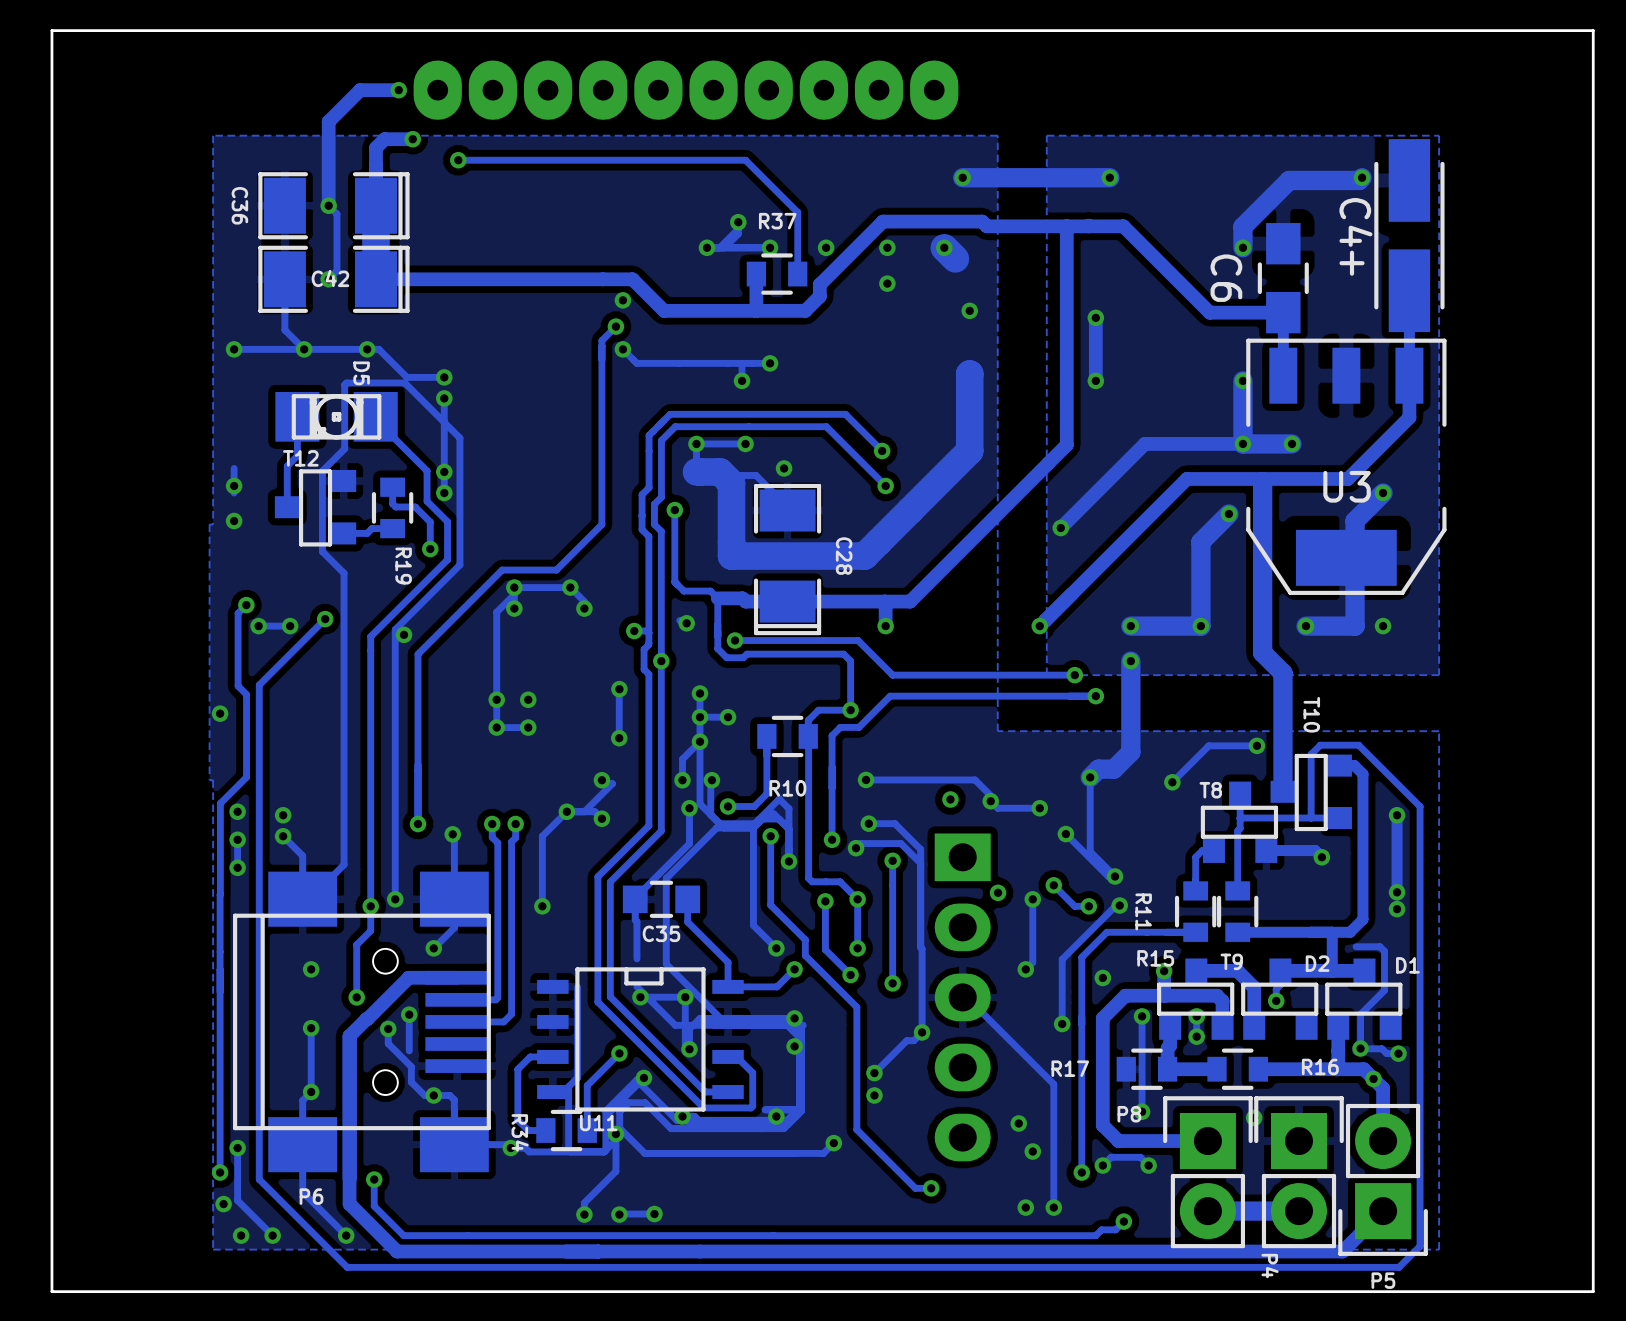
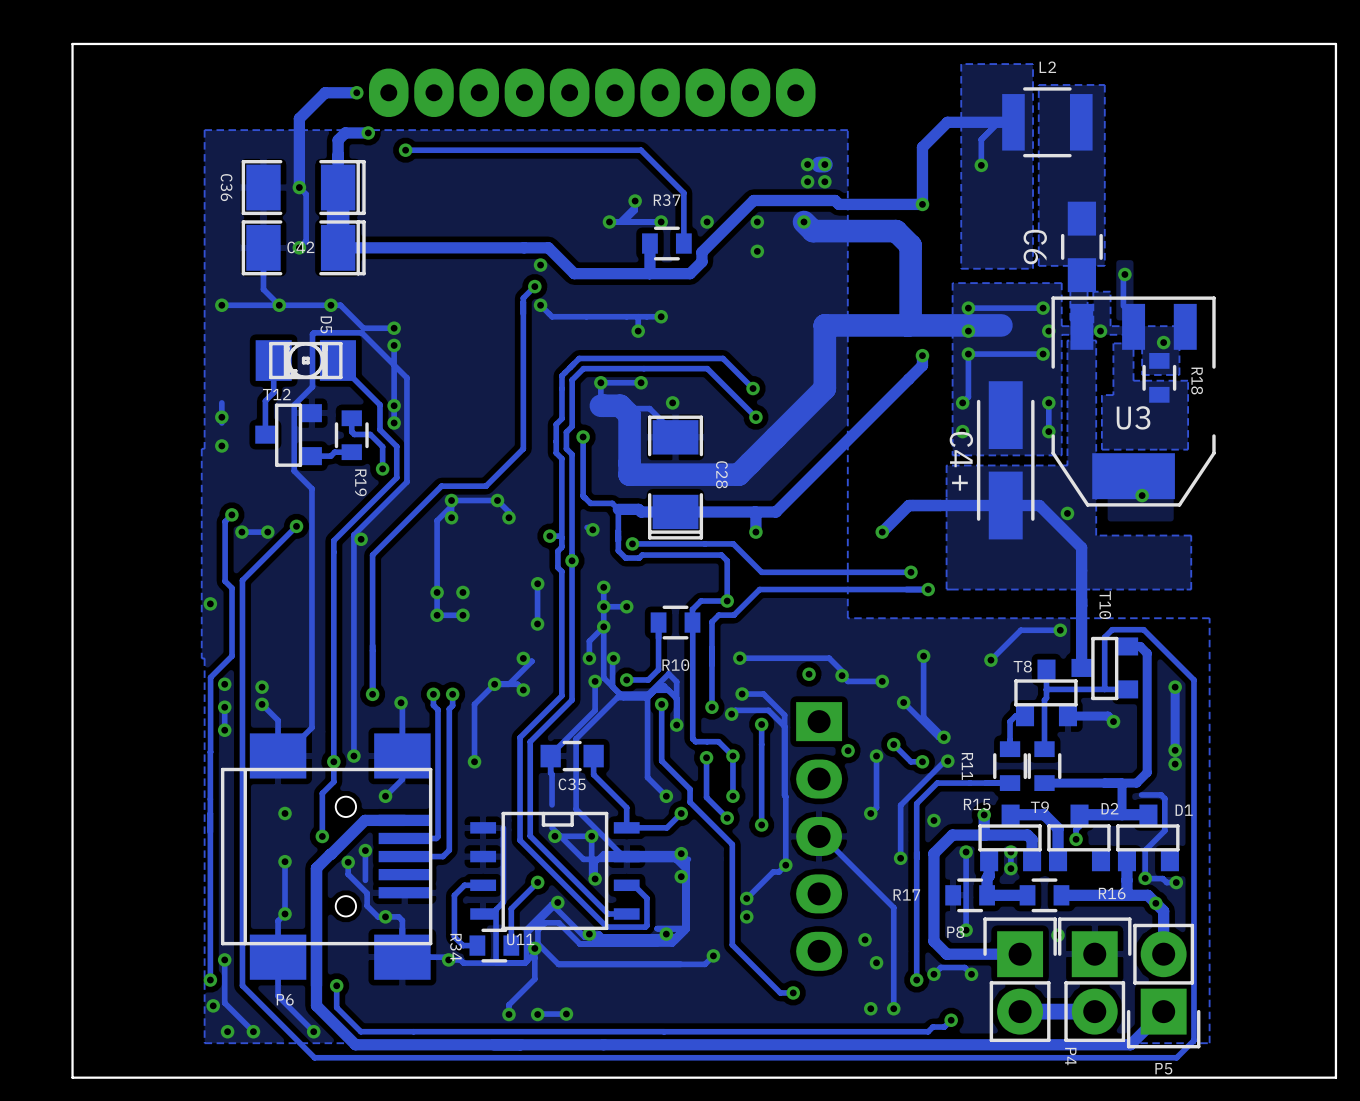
zone outline: none -> (1033, 64) (1033, 268) (961, 268) (961, 64) (1033, 64)
zone outline: none -> (1104, 84) (1038, 84) (1038, 265) (1070, 265) (1070, 320) (1087, 320) (1087, 265) (1104, 265) (1104, 84)
L2: none -> (1047, 122)
zone outline: (1439, 135) (1046, 135) (1046, 675) (1439, 675) (1439, 135) -> none
via: none -> (807, 164)
via: (962, 177) -> none
via: none -> (824, 164)
track: (1109, 177) (969, 177) -> none
via: (1109, 177) -> none
track: (1362, 177) (1359, 180) (1289, 180) (1242, 226) (1242, 247) -> none
via: (1362, 177) -> none
via: none -> (981, 165)
via: none -> (807, 181)
via: none -> (824, 181)
track: (1066, 226) (1066, 444) -> (922, 355) (922, 365) (904, 383)
track: (1088, 226) (1123, 226) (1209, 312) (1283, 312) (1283, 375) -> (922, 203) (922, 147) (947, 122) (1013, 122) (998, 122) (981, 139) (981, 165)
via: none -> (922, 204)
C4 position: (1409, 235) -> (1005, 460)
via: (1242, 247) -> none
track: none -> (813, 231) (896, 231) (910, 245) (910, 322) (907, 325)
track: (1409, 290) (1409, 417) (1347, 478) (1186, 478) (1072, 593) -> (1081, 570) (1081, 547) (1039, 505) (908, 505)
via: (969, 310) -> none
track: none -> (1124, 274) (1123, 306)
via: none -> (1124, 274)
track: (1095, 317) (1095, 380) -> none
via: (1095, 317) -> none
zone outline: none -> (1061, 283) (1061, 326) (1093, 326) (1093, 291) (1110, 291) (1110, 326) (1179, 326) (1179, 374) (1142, 374) (1142, 334) (1061, 334) (1061, 455) (952, 455) (952, 283) (1061, 283)
via: none -> (968, 308)
track: none -> (1043, 308) (968, 308) (968, 331)
via: none -> (1043, 308)
track: none -> (1001, 325) (824, 325)
via: (1095, 380) -> none
via: none -> (968, 331)
track: (1242, 380) (1242, 443) -> none
via: none -> (1100, 331)
zone outline: none -> (1096, 340) (1096, 535) (1191, 535) (1191, 589) (946, 589) (946, 465) (1067, 465) (1067, 340) (1096, 340)
via: none -> (1163, 342)
zone outline: none -> (1133, 343) (1113, 343) (1113, 395) (1101, 395) (1101, 449) (1188, 449) (1188, 380) (1133, 380) (1133, 343)
via: none -> (968, 354)
track: none -> (1043, 354) (968, 354) (968, 397) (962, 402)
via: none -> (1043, 354)
via: none -> (922, 355)
R18: none -> (1159, 377)
track: (1242, 443) (1144, 443) (1060, 528) -> none
via: (1242, 443) -> none
track: (1291, 443) (1242, 443) -> none
via: (1291, 443) -> none
via: none -> (962, 402)
track: none -> (1048, 402) (1048, 431)
via: none -> (1048, 402)
track: (1262, 478) (1262, 652) (1282, 673) (1282, 791) -> none
track: (1383, 492) (1355, 521) (1355, 626) (1306, 626) -> none
via: (1383, 492) -> none
via: none -> (962, 431)
track: (1228, 514) (1200, 542) (1200, 626) (1130, 626) -> none
via position: (1228, 514) -> (1048, 431)
via: (1060, 528) -> none
via: none -> (1142, 495)
via: none -> (1067, 513)
via: (1130, 626) -> none
via: (1200, 626) -> none
via: (1306, 626) -> none
via: (1383, 626) -> none
track: (1130, 661) (1130, 752) (1113, 769) (1098, 769) (1090, 777) -> none
via: (1130, 661) -> none

